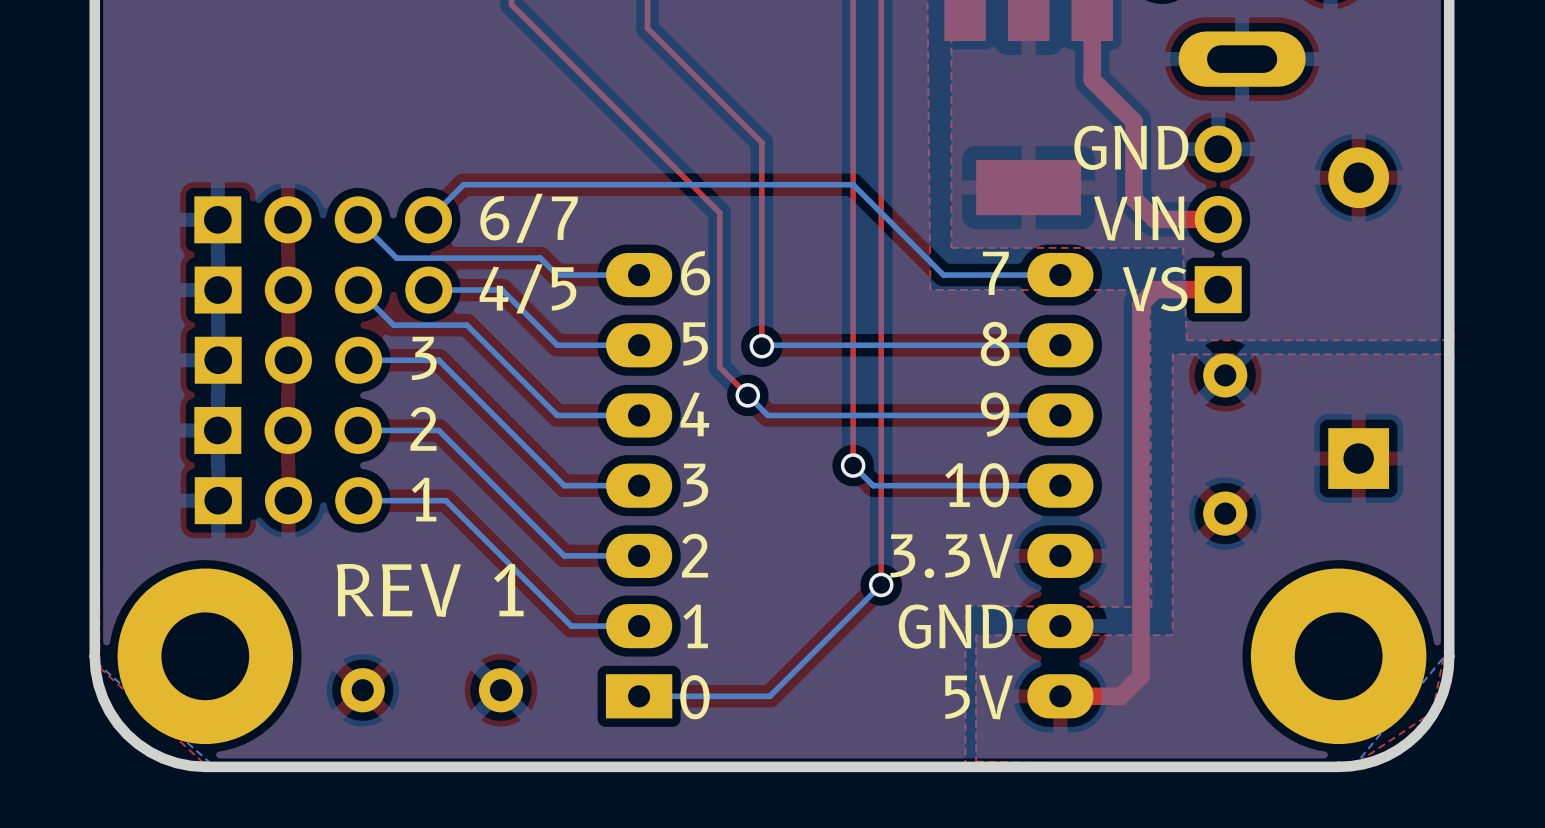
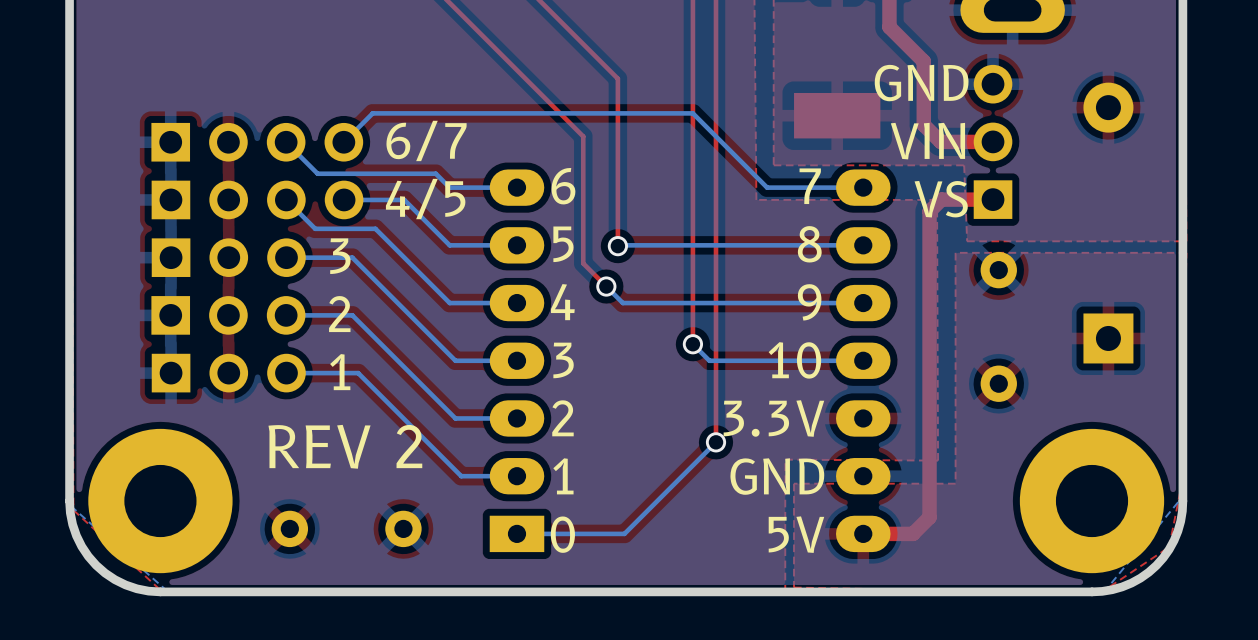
text: REV 1 (430, 590) -> REV 2 (345, 446)

